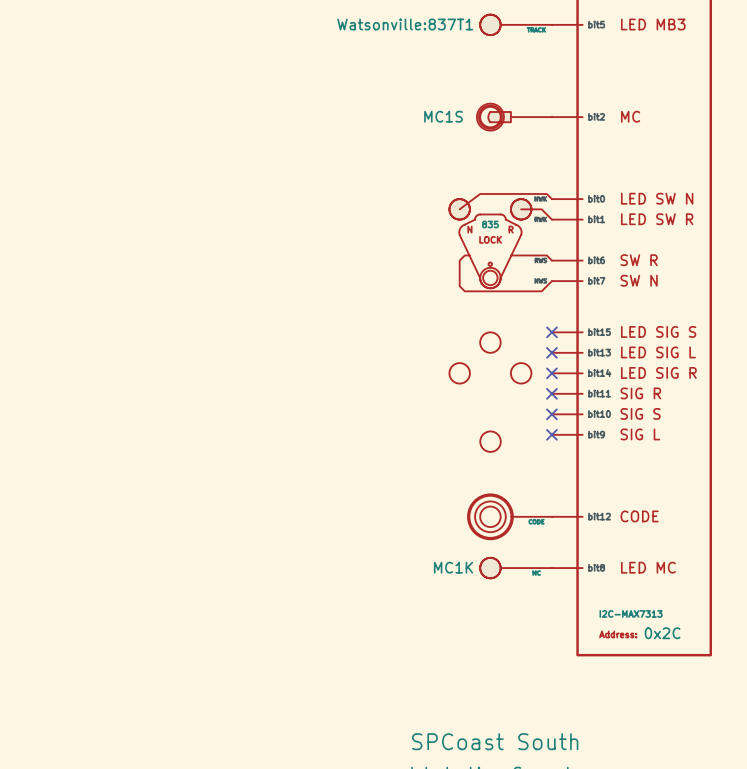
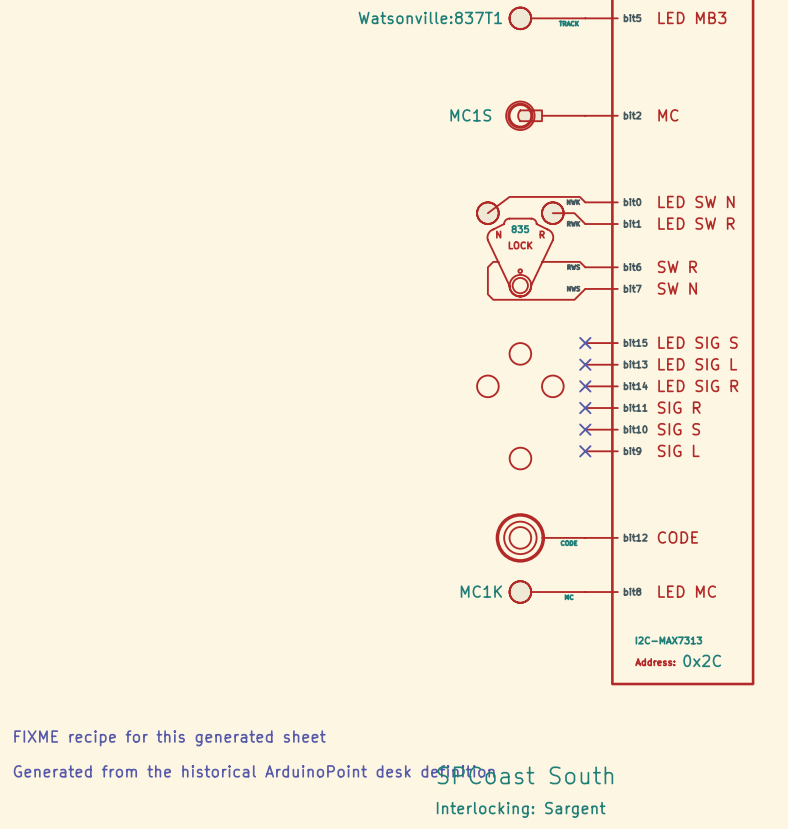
text: none -> FIXME recipe for this generated sheet (169, 738)
text: none -> Generated from the historical ArduinoPoint desk definition (254, 771)

